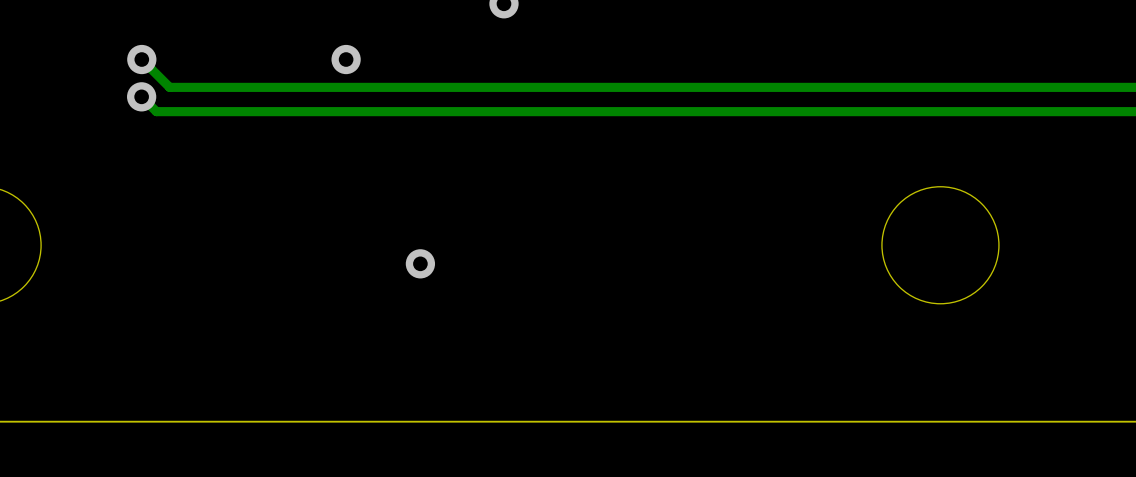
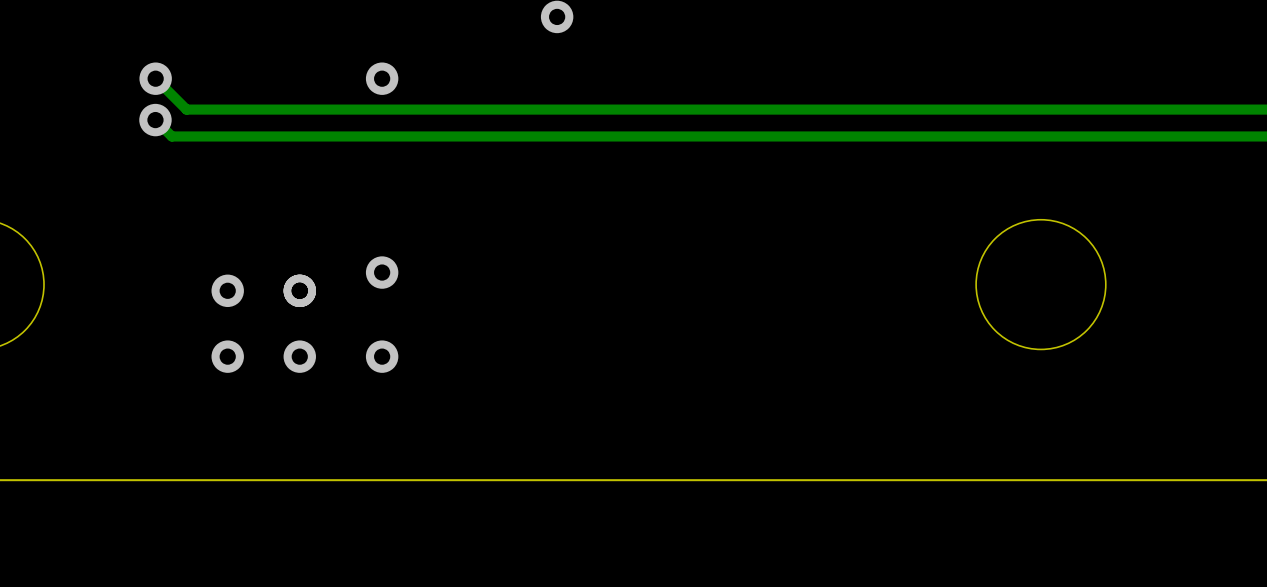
via: none -> (382, 272)
via: none -> (227, 290)
via: none -> (299, 290)
via: (420, 263) -> none
via: none -> (227, 356)
via: none -> (299, 356)
via: none -> (382, 356)

